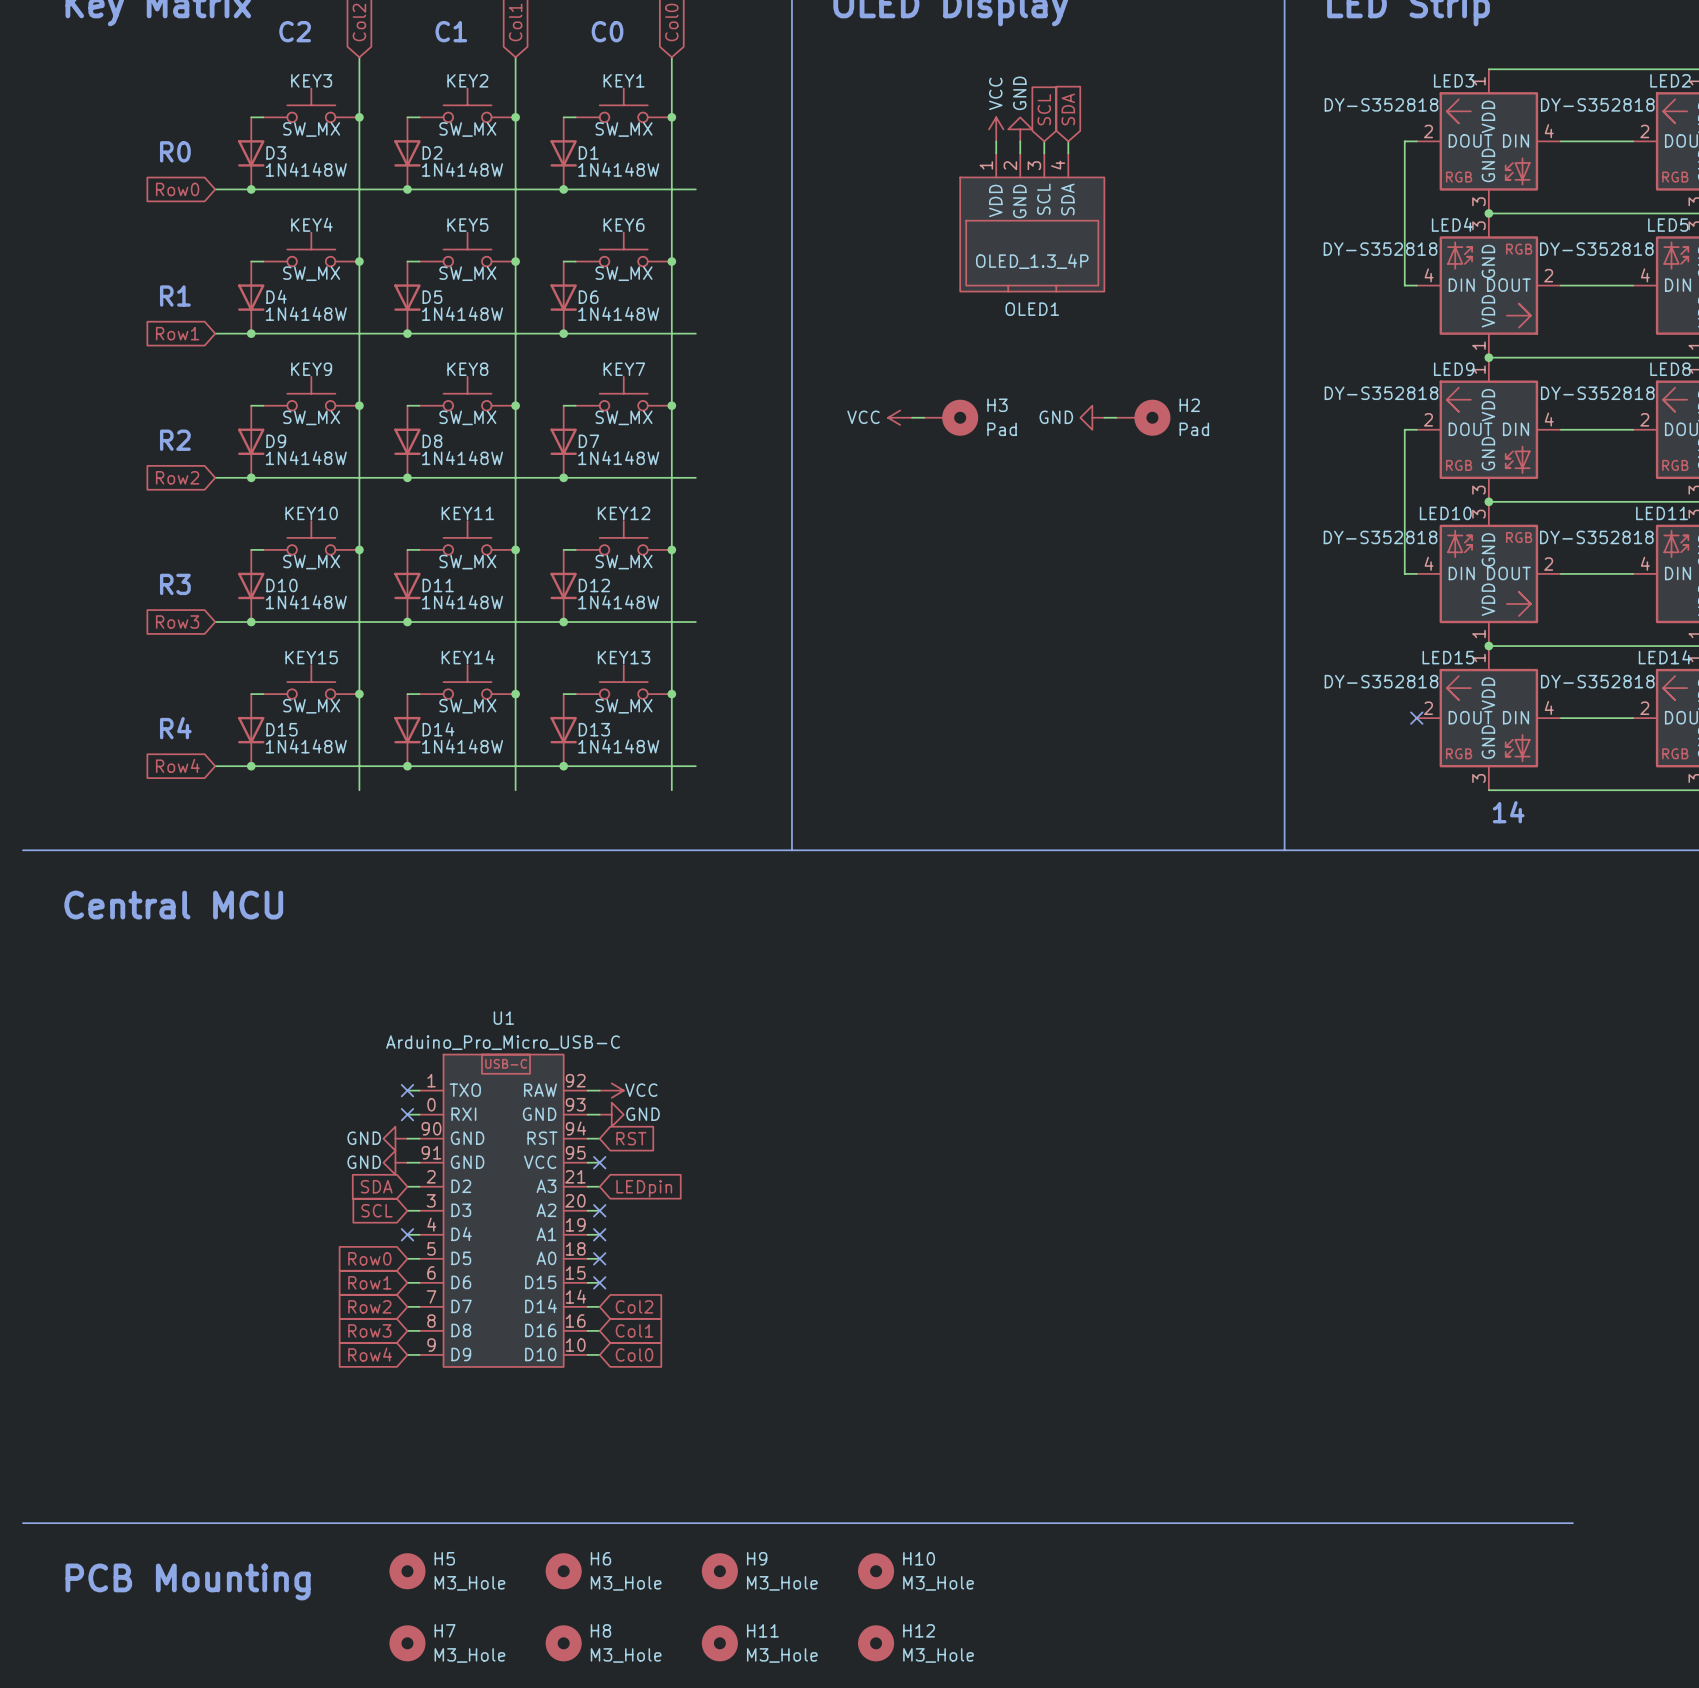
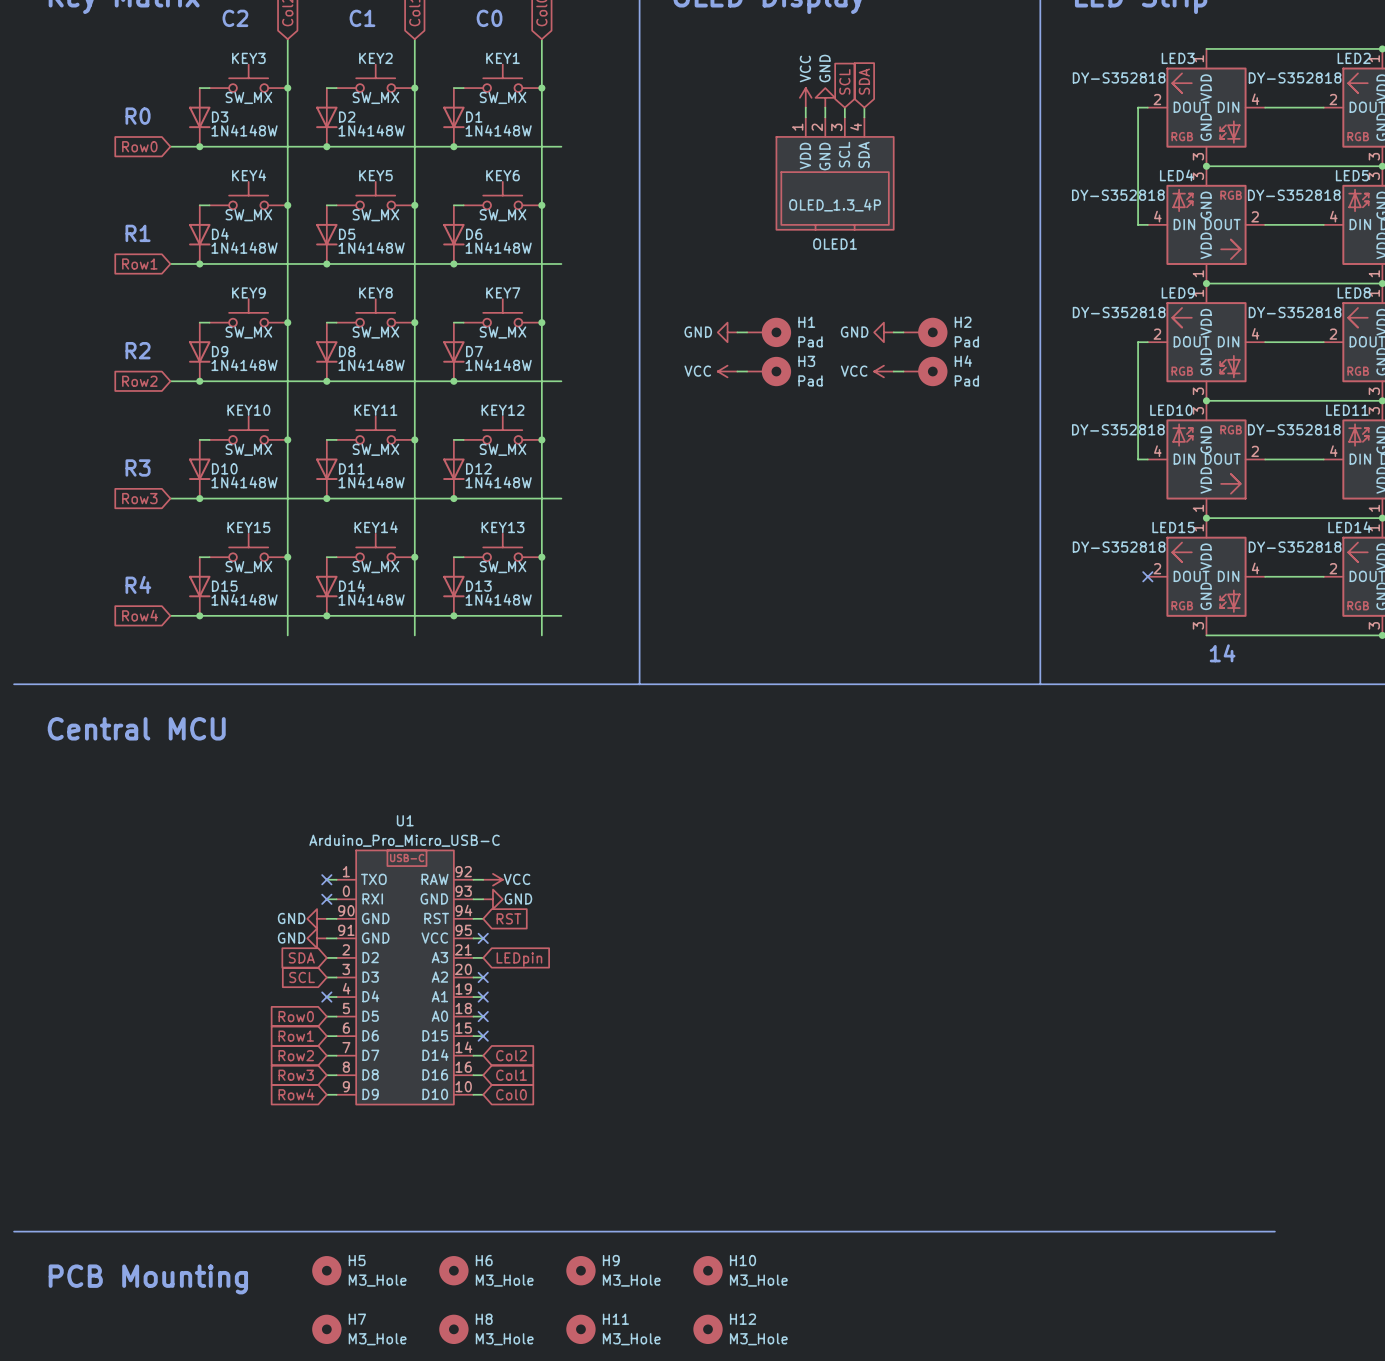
H3 name: H3 (997, 405) -> H1 (806, 322)
power symbol: VCC (900, 417) -> GND (727, 332)
power symbol: none -> VCC (727, 371)
wire: none -> (737, 371) (747, 371)
H3: none -> Pad (769, 371)
power symbol: none -> VCC (883, 371)
wire: none -> (893, 371) (903, 371)
H4: none -> Pad (925, 371)

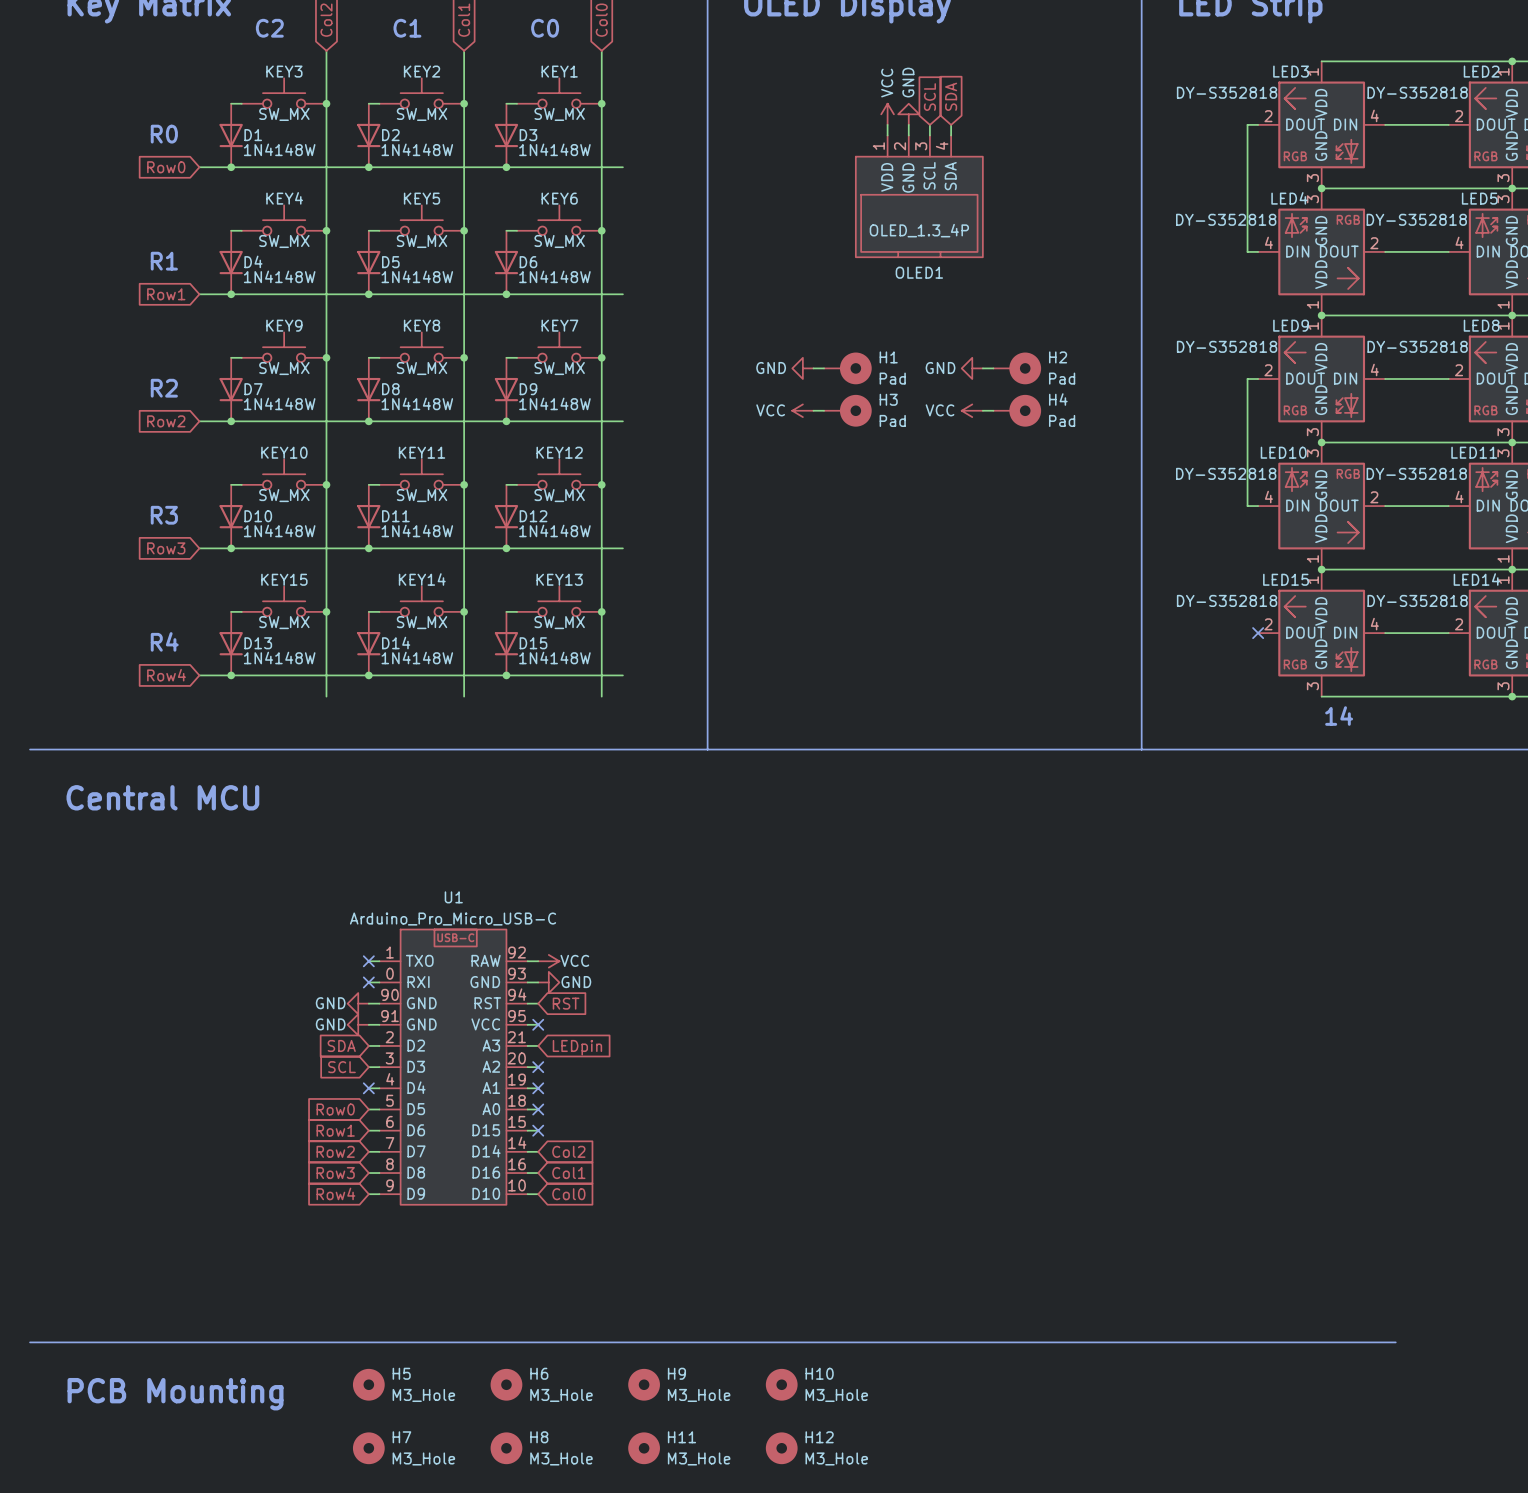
D3 name: D3 (220, 117) -> D1 (253, 135)
D1 name: D1 (474, 117) -> D3 (528, 135)
D9 name: D9 (220, 351) -> D7 (253, 389)
D7 name: D7 (474, 351) -> D9 (528, 389)
D15 name: D15 (224, 586) -> D13 (258, 643)
D13 name: D13 (478, 586) -> D15 (533, 643)

